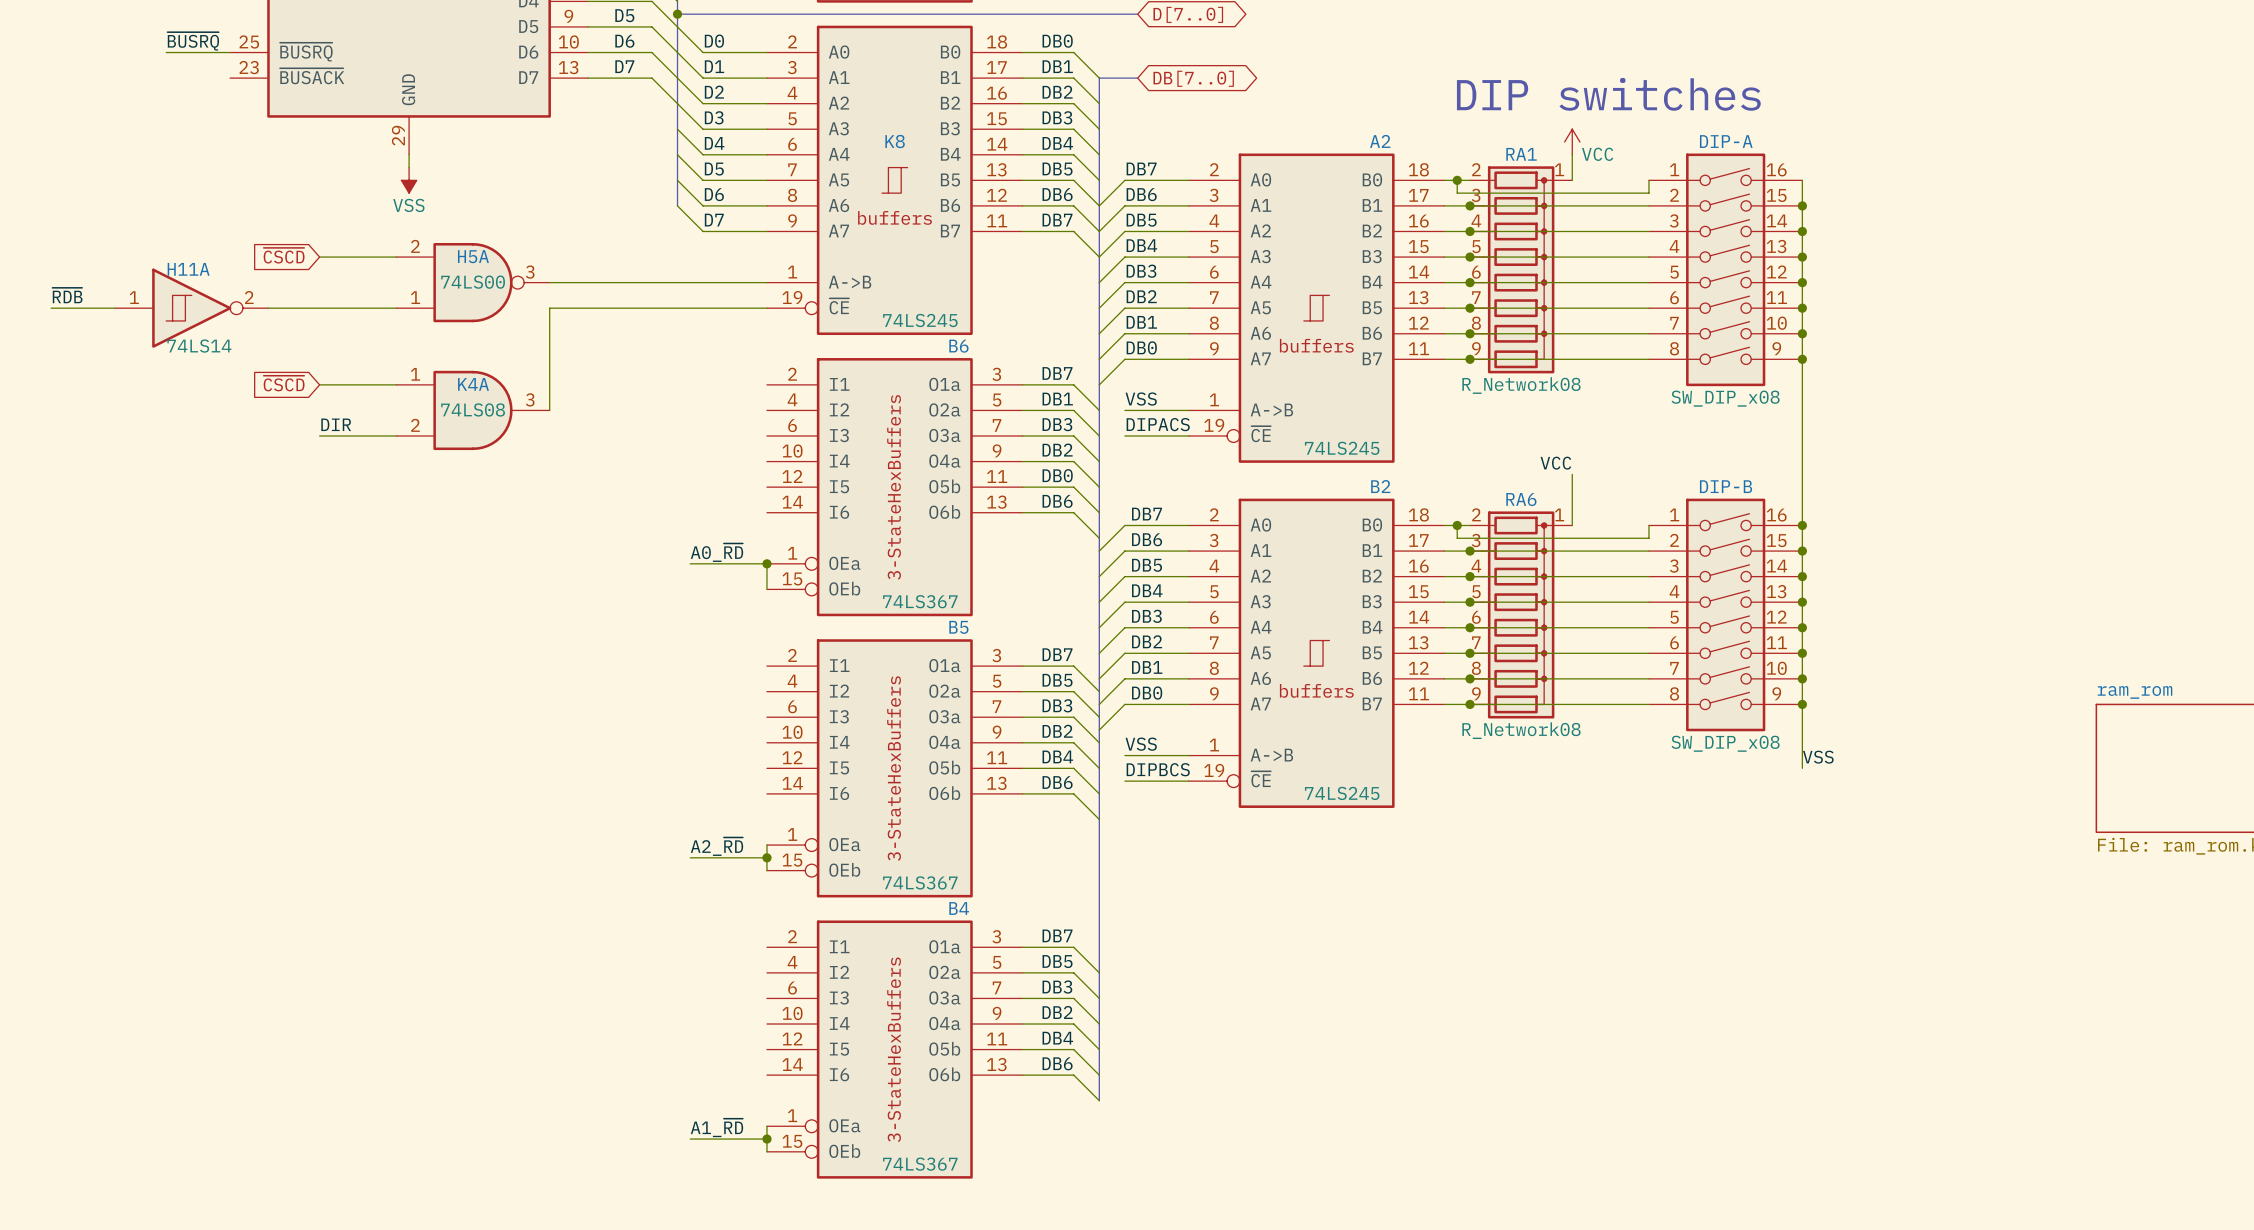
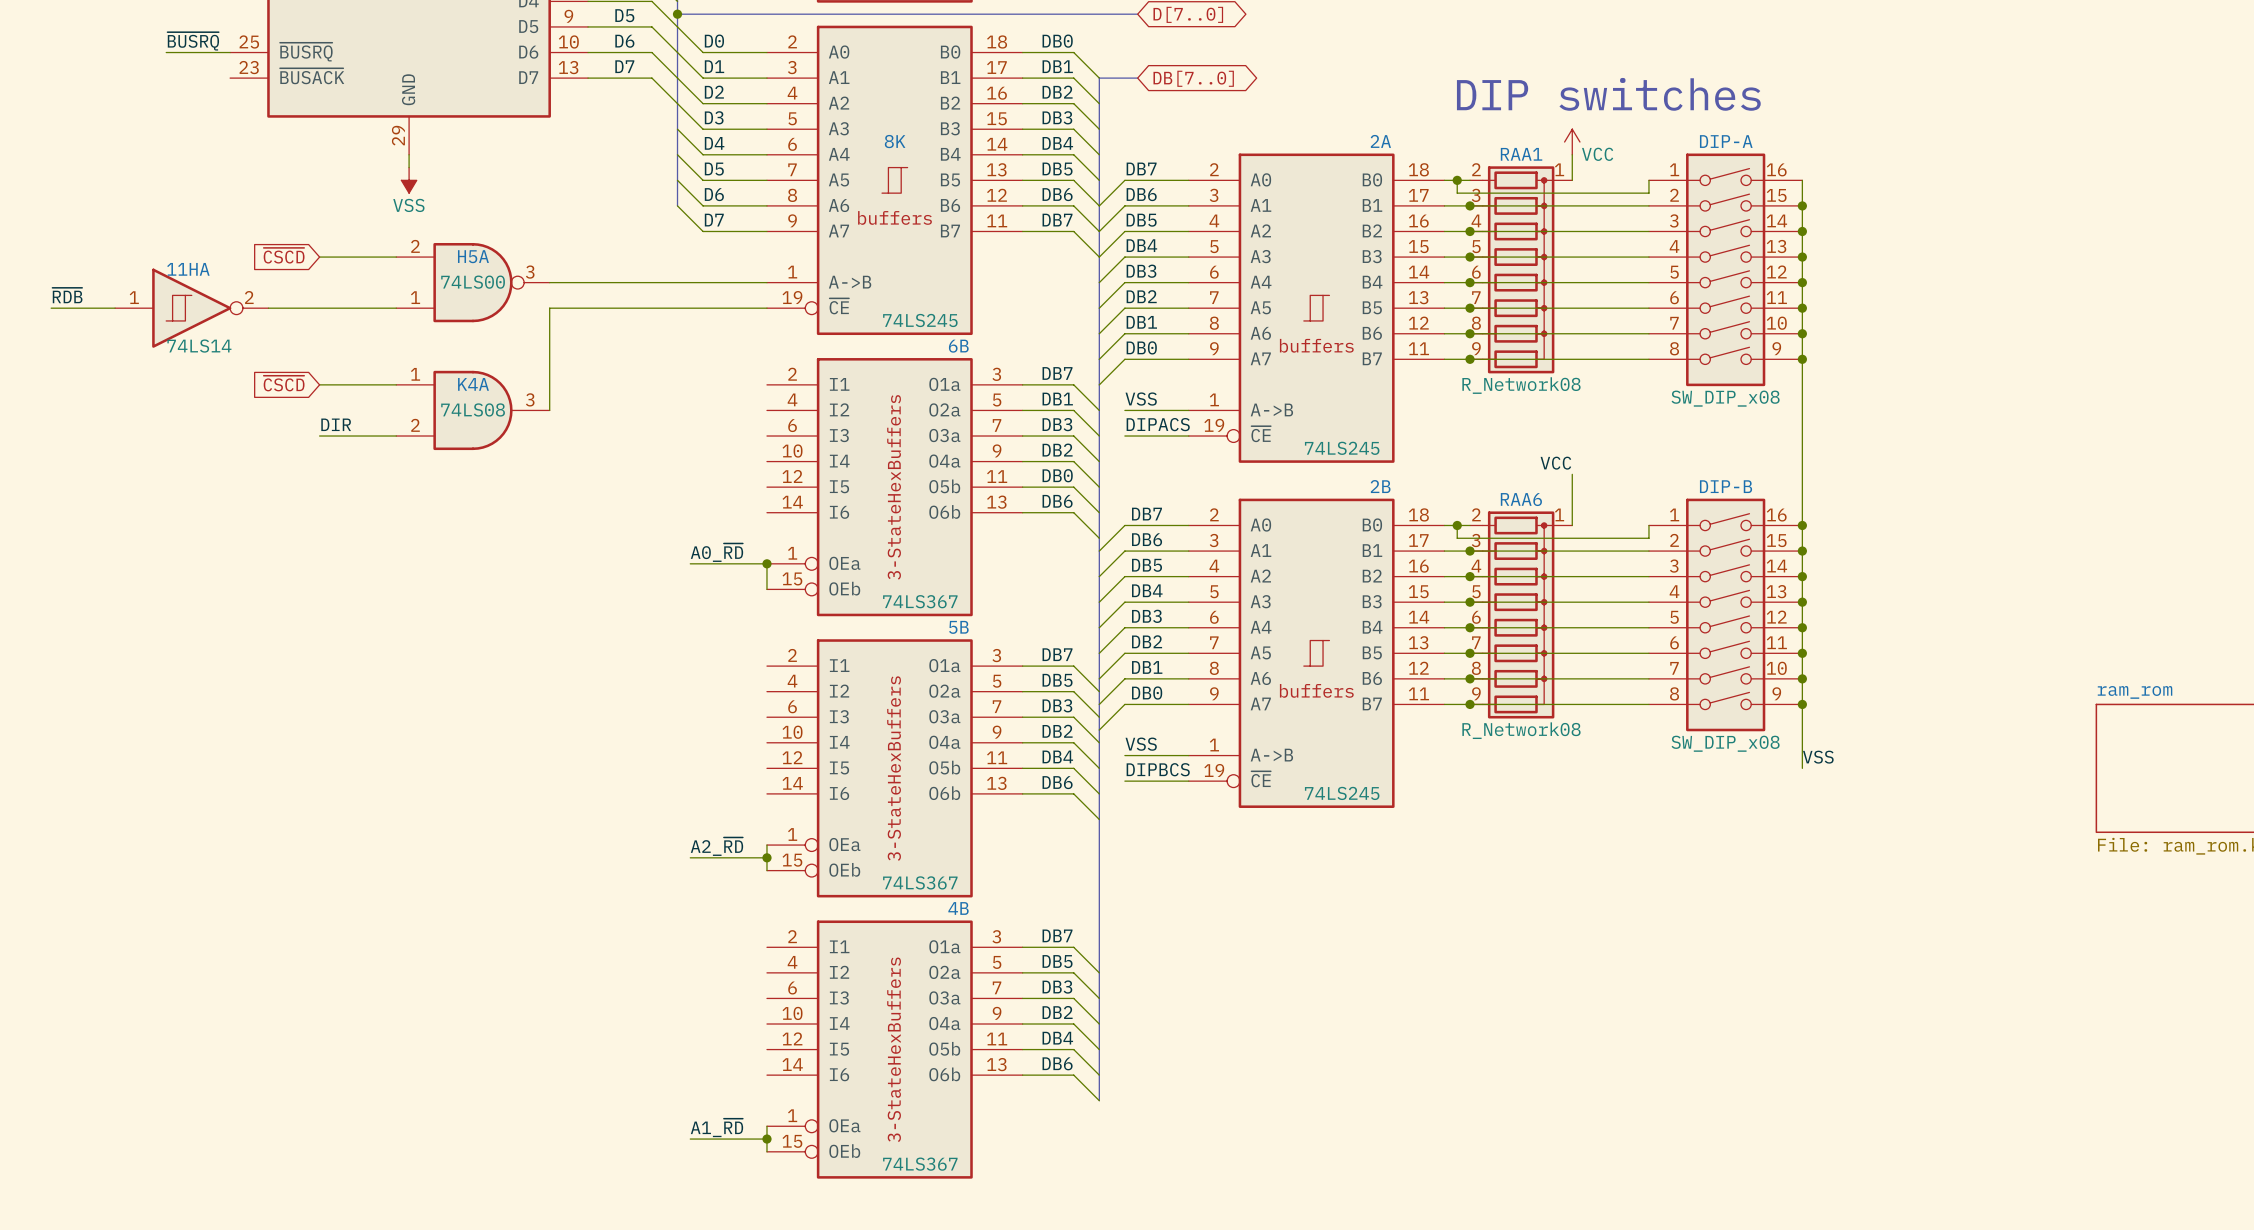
K8 name: K8 (895, 141) -> 8K (895, 141)
A2 name: A2 (1380, 141) -> 2A (1380, 141)
RA1 name: RA1 (1521, 154) -> RAA1 (1521, 154)
H11A name: H11A (188, 269) -> 11HA (188, 269)
B6 name: B6 (958, 346) -> 6B (958, 346)
B2 name: B2 (1380, 486) -> 2B (1380, 486)
RA6 name: RA6 (1521, 499) -> RAA6 (1521, 499)
B5 name: B5 (958, 627) -> 5B (958, 627)
B4 name: B4 (959, 908) -> 4B (958, 908)

